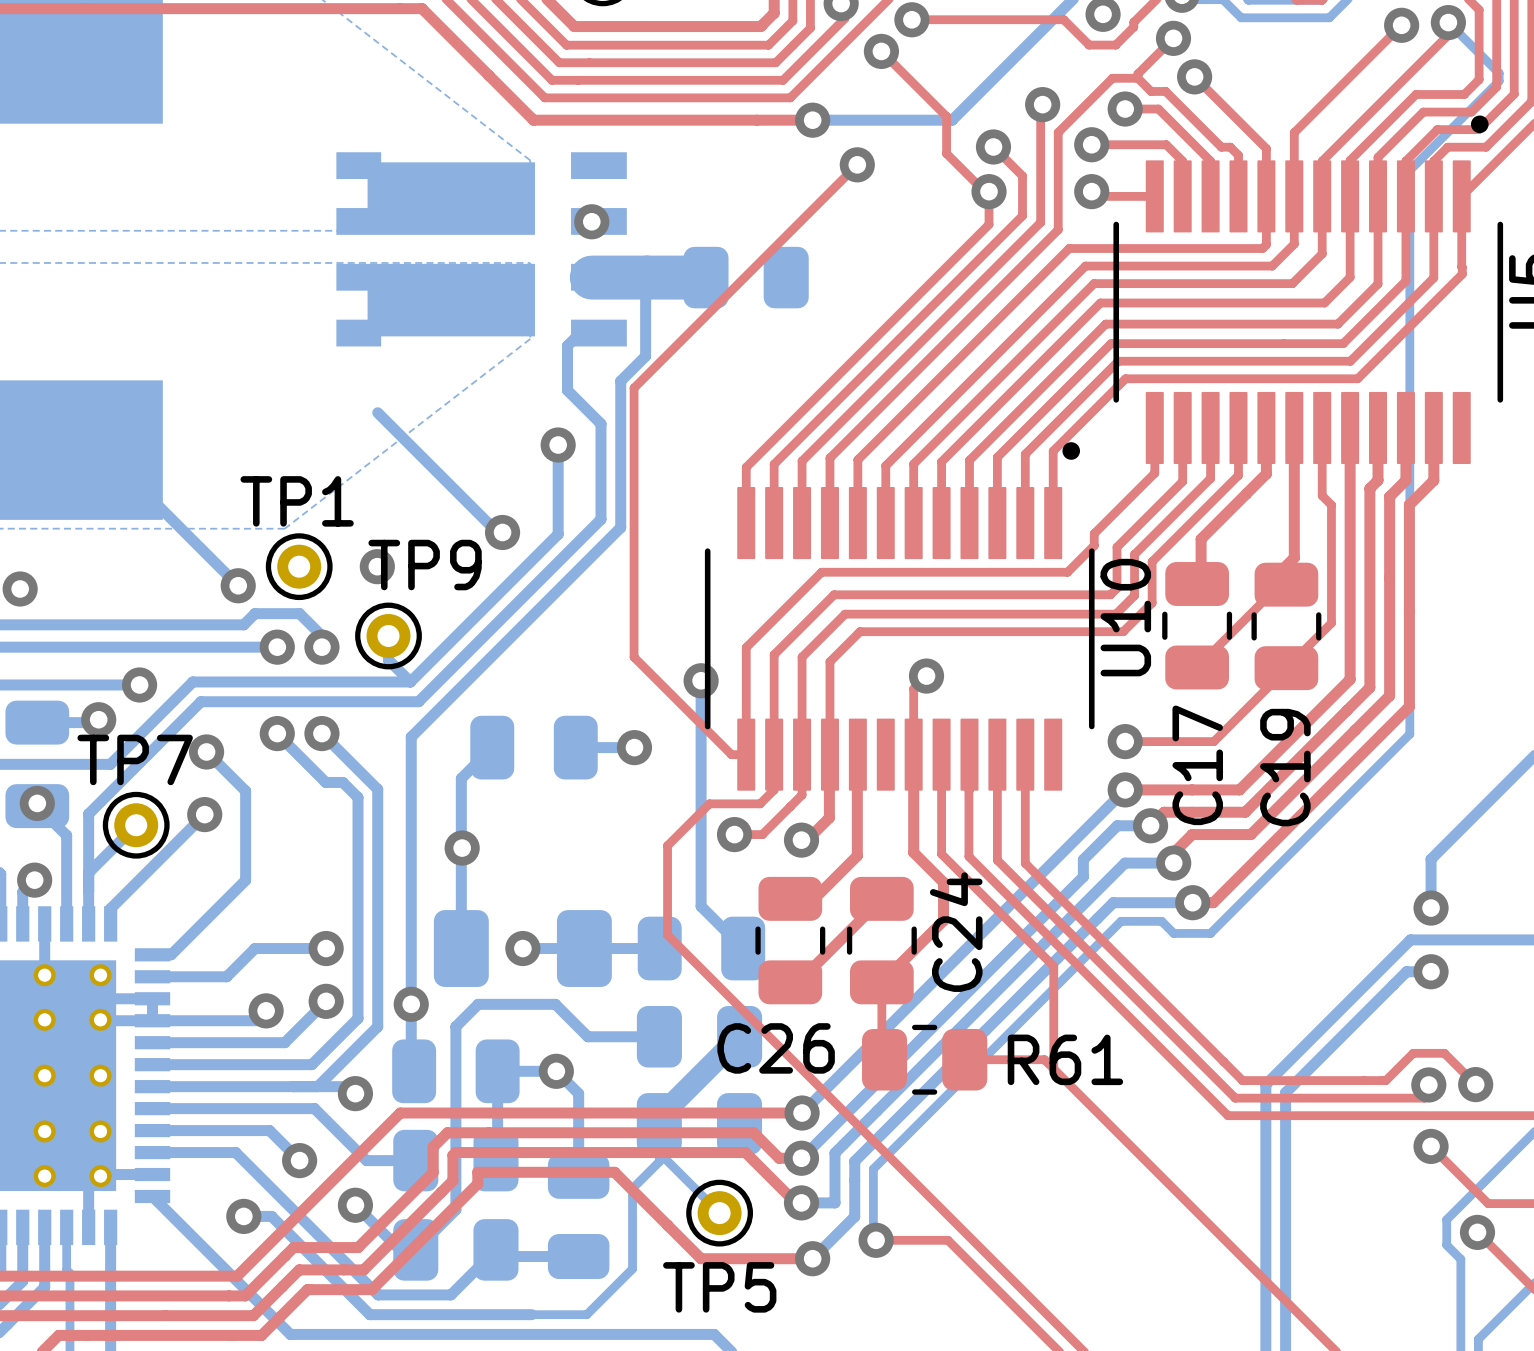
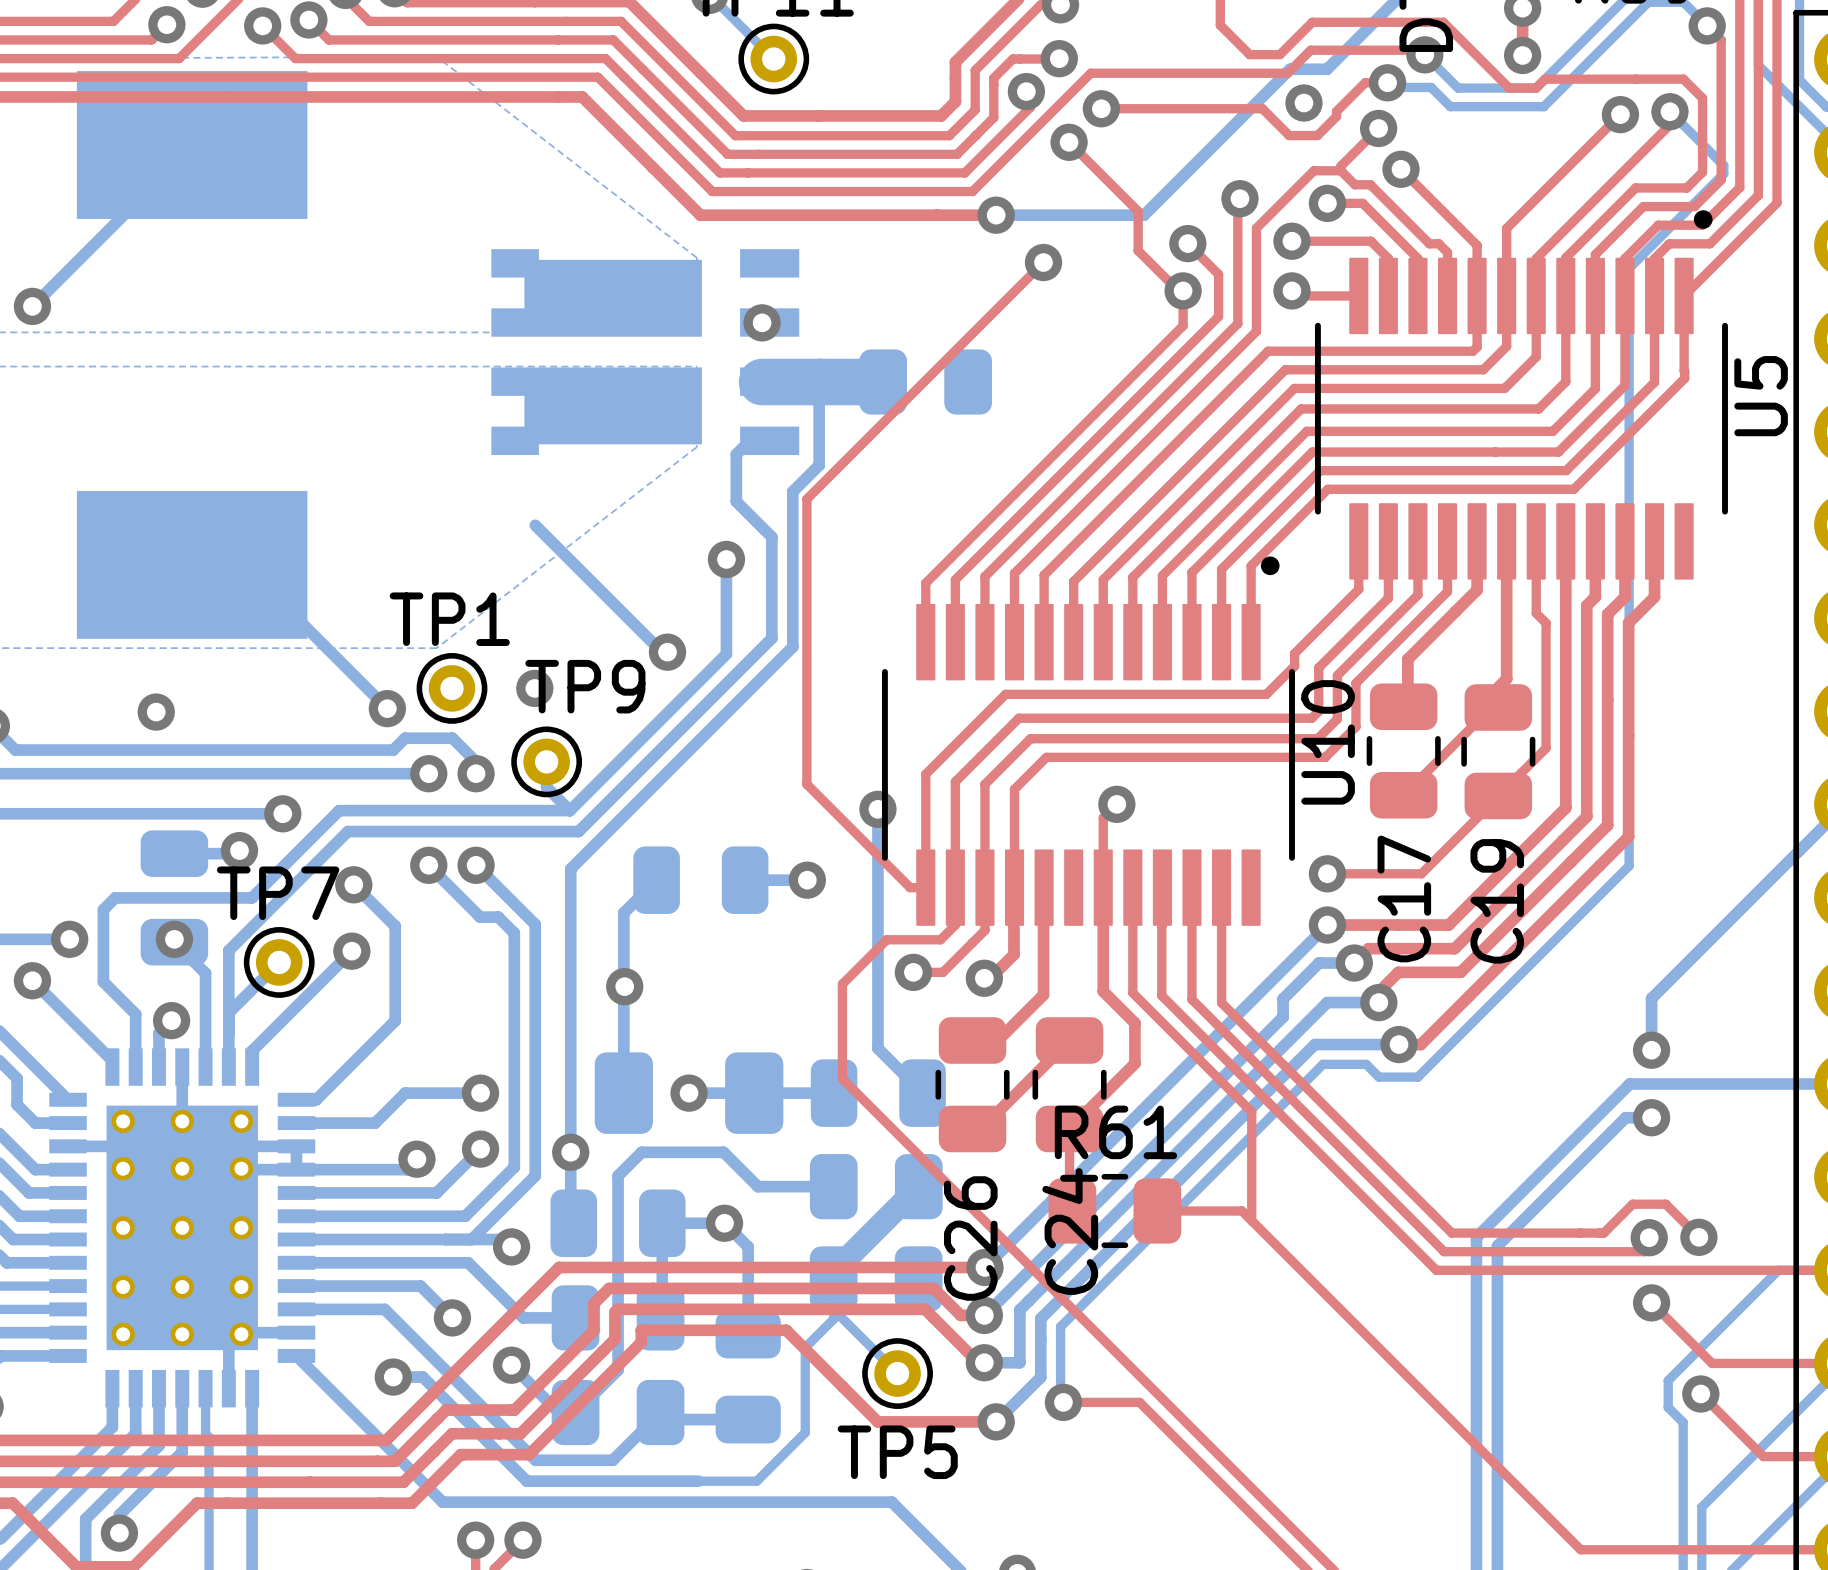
C24 name position: C24 (956, 932) -> C24 (1070, 1231)
C26 name rotation: 0° (776, 1048) -> 90° counterclockwise (970, 1238)
R61 name position: R61 (1065, 1059) -> R61 (1115, 1132)

